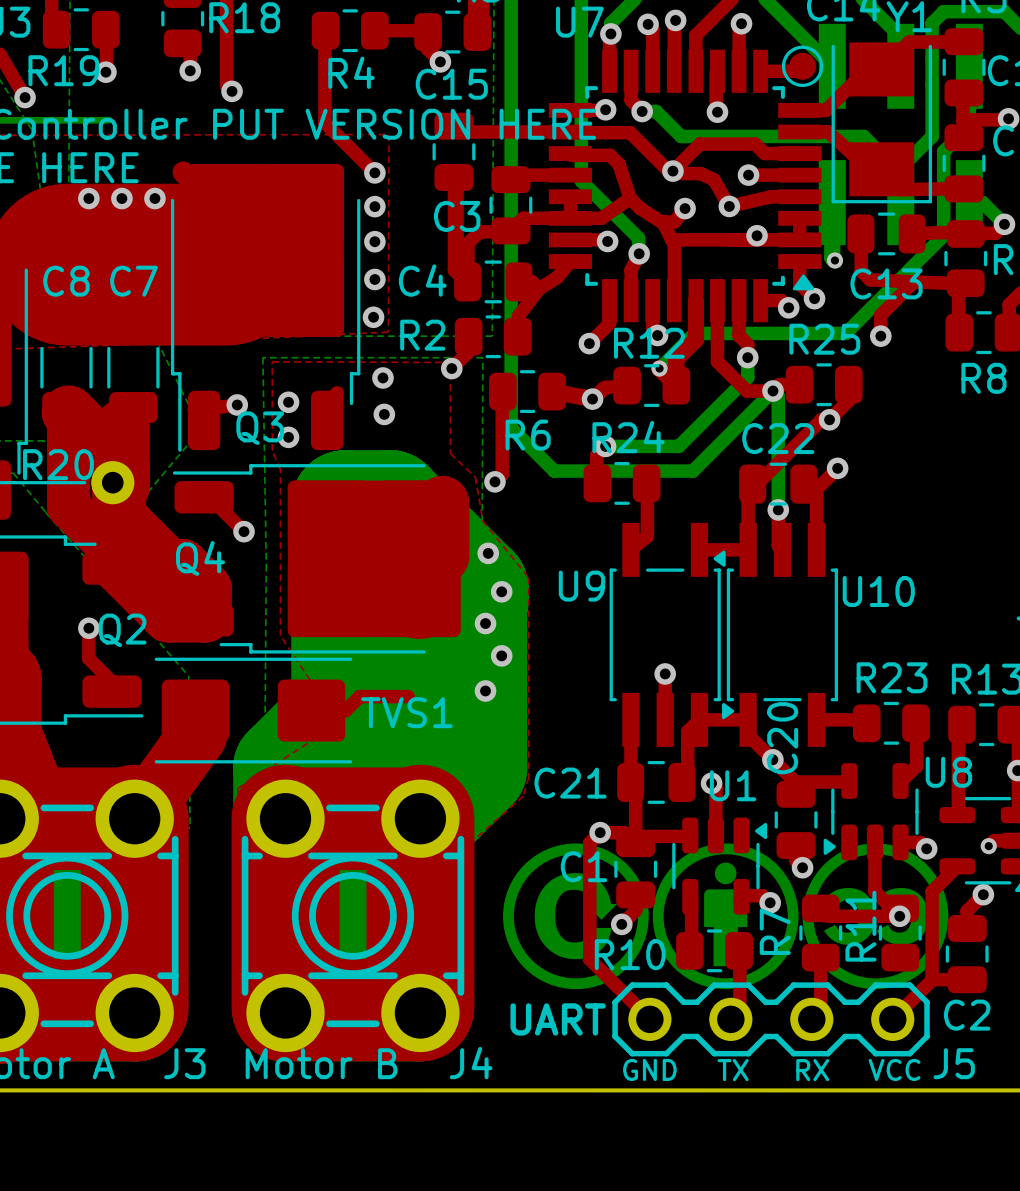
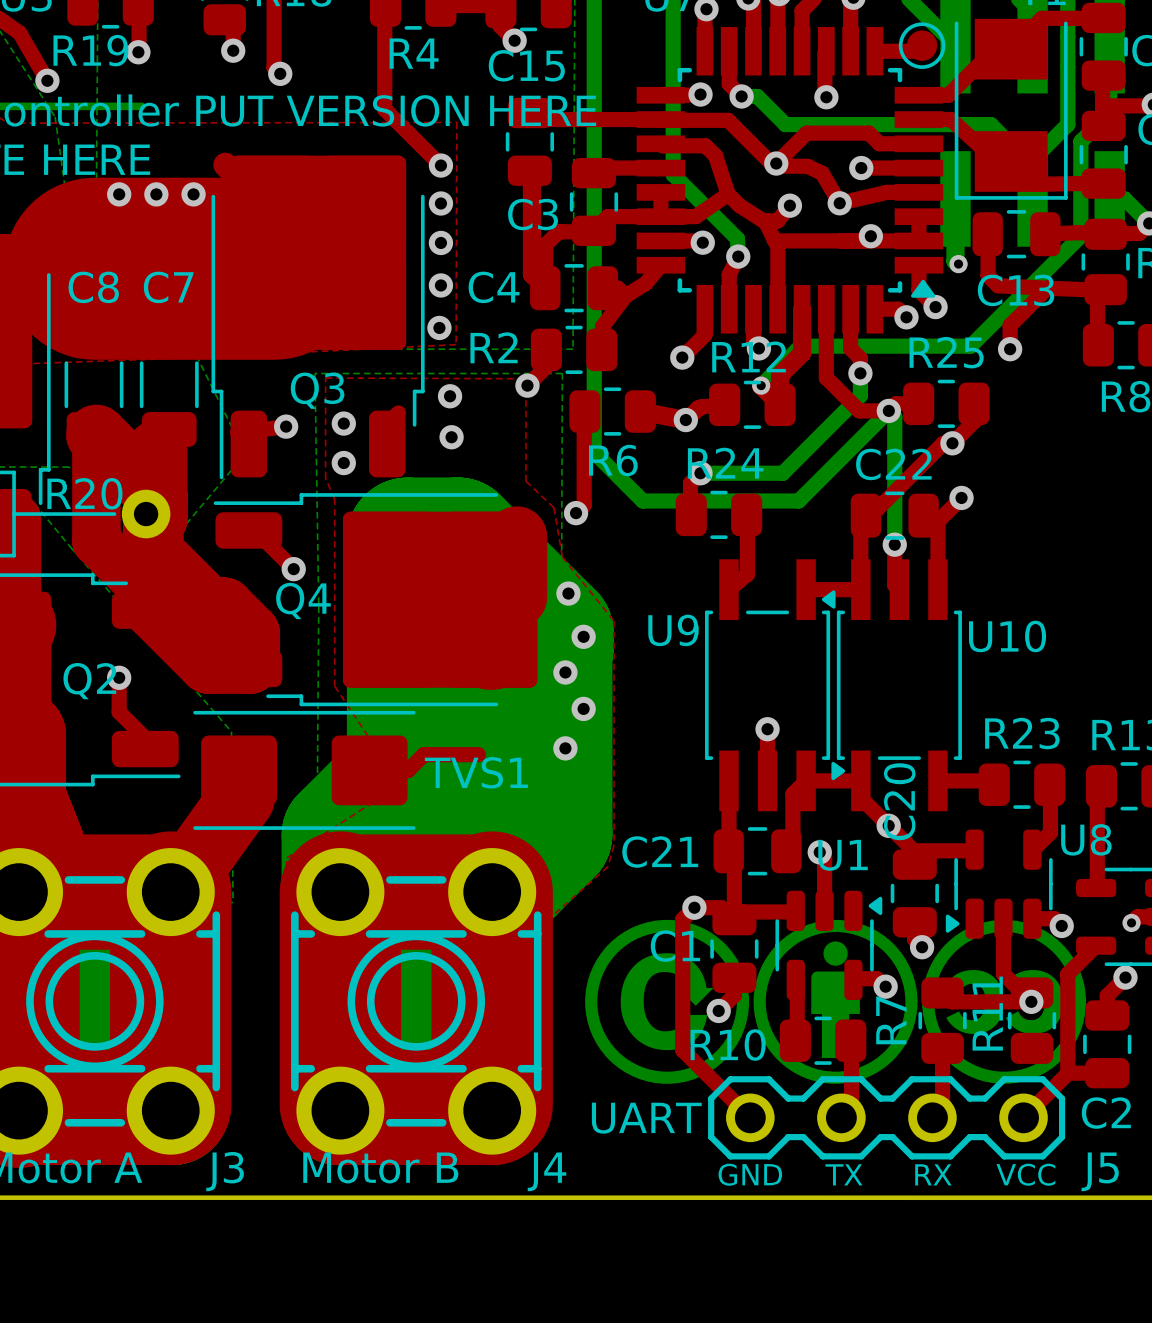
Q3 name position: Q3 (260, 428) -> Q3 (317, 390)
Q4 name position: Q4 (200, 558) -> Q4 (303, 600)
Q2 name position: Q2 (122, 630) -> Q2 (89, 681)

